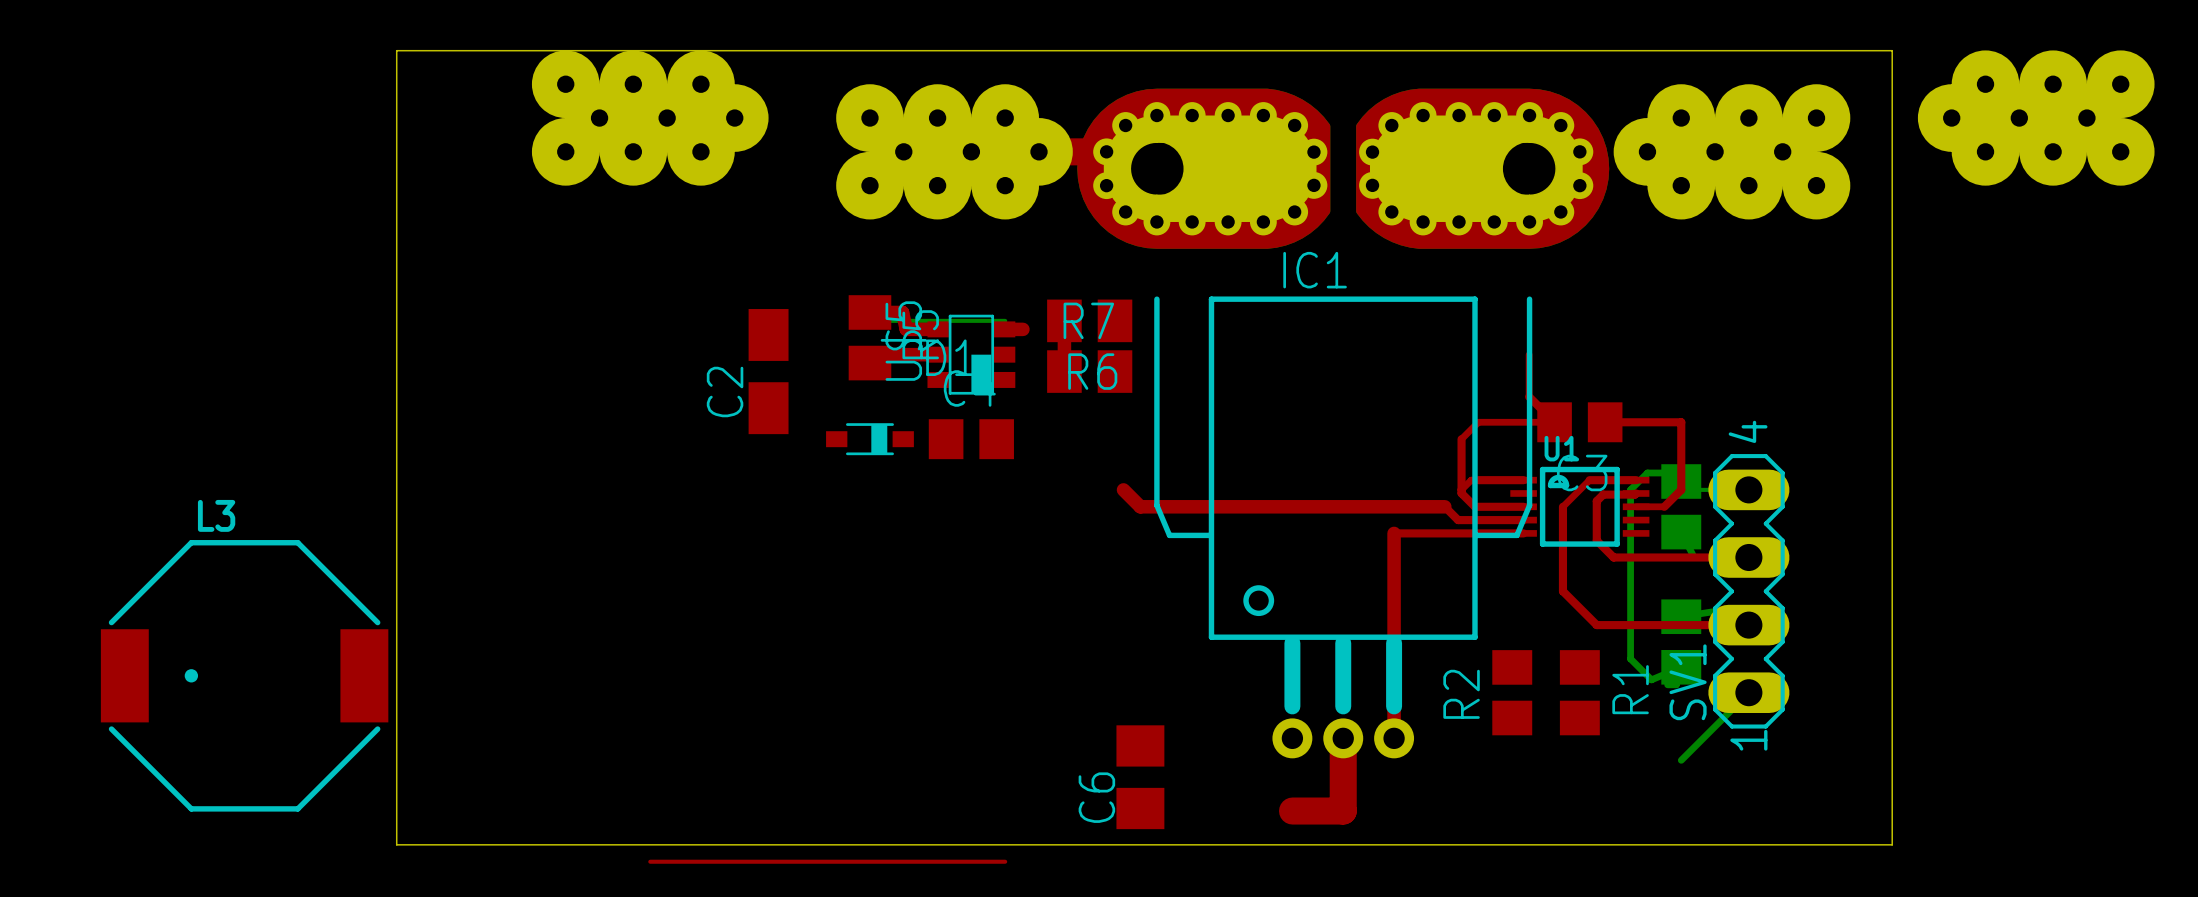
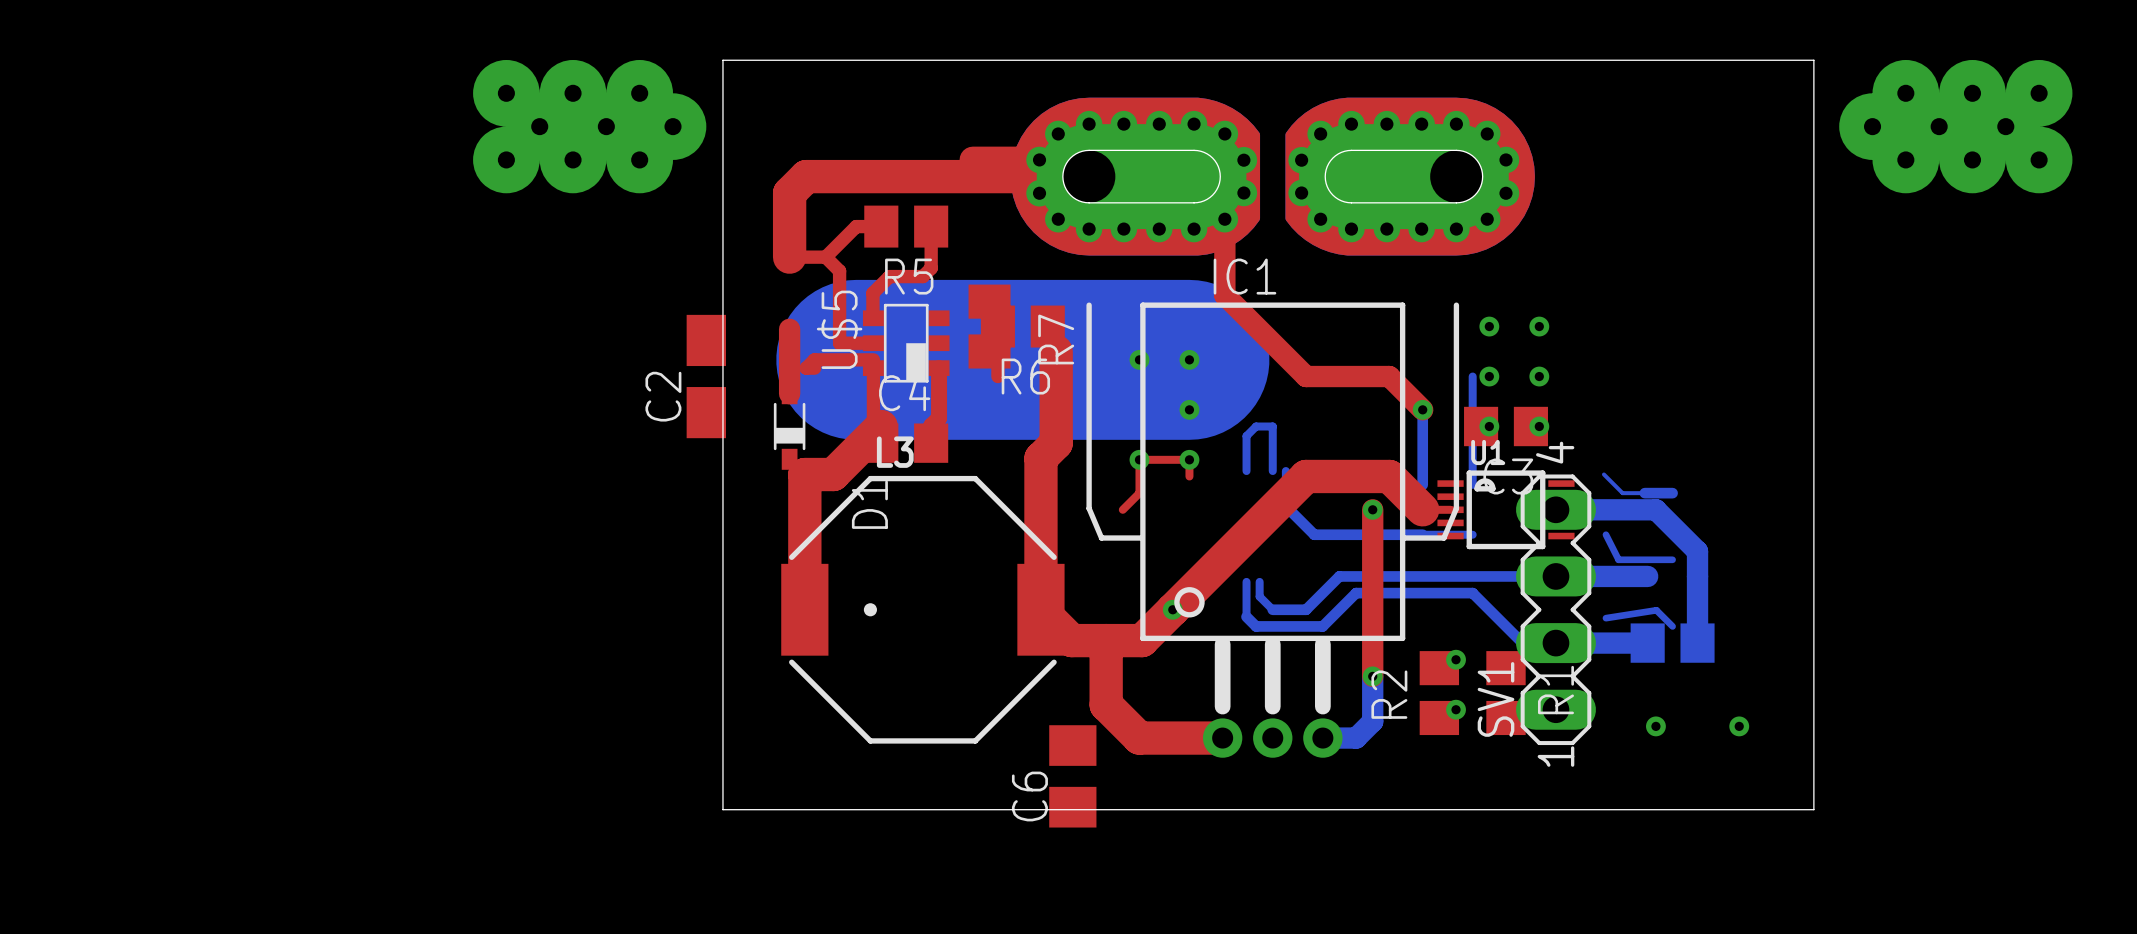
board edge: (785, 50) (396, 50) (396, 844) (1892, 844) (1892, 811) -> (722, 60) (722, 809) (1813, 809)
part: (954, 151) -> none
part: (1731, 151) -> none
top track: none -> (1089, 176) (806, 176) (789, 193) (789, 257) (825, 257)
top track: none -> (1224, 219) (1224, 295) (1306, 376) (1389, 376) (1422, 409)
top track: none -> (881, 226) (856, 226) (825, 257)
top track: none -> (931, 226) (931, 268) (922, 276) (889, 276) (872, 293) (873, 318)
top track: none -> (825, 257) (839, 271) (839, 343) (873, 343)
top track: (869, 312) (902, 312) (906, 329) (938, 329) -> none
bottom track: (869, 320) (1005, 320) -> none
via: none -> (1489, 326)
via: none -> (1539, 326)
top track: none -> (789, 329) (789, 393)
top track: (1004, 329) (1022, 329) -> none
R5 rotation: 0° (869, 337) -> 90° clockwise (906, 226)
R5 position: (869, 337) -> (906, 226)
top track: none -> (1056, 351) (1056, 443) (1040, 458) (1040, 609)
bottom track: none -> (856, 359) (1189, 359)
U$5 position: (971, 354) -> (906, 343)
via: none -> (1139, 359)
via: none -> (1189, 359)
top track: (1529, 354) (1529, 396) (1554, 422) (1478, 422) (1461, 439) (1461, 493) (1475, 506) (1495, 506) -> (1040, 609) (1071, 640) (1141, 640) (1306, 476) (1389, 476) (1422, 509)
top track: none -> (873, 368) (873, 418) (881, 426) (833, 474) (804, 474) (804, 609)
top track: none -> (939, 368) (939, 418) (931, 425)
R7 rotation: 0° (1089, 371) -> 90° clockwise (989, 326)
R7 position: (1089, 371) -> (989, 326)
bottom track: none -> (1472, 376) (1472, 484)
via: none -> (1489, 376)
via: none -> (1539, 376)
via: none -> (1189, 409)
bottom track: none -> (1422, 409) (1422, 484)
via: none -> (1422, 409)
via: none -> (1489, 426)
top track: (1605, 422) (1681, 422) (1681, 489) (1664, 506) (1636, 506) -> none
via: none -> (1539, 426)
D1 rotation: 0° (869, 439) -> 90° clockwise (789, 426)
via: none -> (1139, 459)
via: none -> (1189, 459)
bottom track: none -> (1246, 471) (1246, 436) (1256, 426) (1272, 426) (1272, 471)
bottom track: none -> (1285, 471) (1285, 506) (1314, 534) (1472, 534)
top track: none -> (1189, 476) (1189, 459) (1139, 459) (1139, 493) (1122, 509)
top track: (1478, 480) (1523, 480) (1471, 480) (1461, 489) -> none
top track: (1636, 480) (1589, 480) (1562, 506) (1562, 591) (1596, 625) (1748, 625) -> none
bottom track: (1681, 481) (1679, 470) (1677, 472) (1647, 472) (1630, 489) (1630, 658) (1651, 679) (1681, 667) (1676, 684) (1667, 684) -> none
top track: (1123, 489) (1140, 506) (1444, 506) (1458, 520) (1523, 520) -> none
top track: (1636, 493) (1603, 494) (1596, 501) (1596, 540) (1613, 557) (1719, 557) -> none
top track: none -> (1372, 509) (1372, 676)
via: none -> (1372, 509)
bottom track: none -> (1555, 509) (1655, 509) (1697, 551) (1697, 643)
part: (1681, 506) -> none
top track: (1523, 533) (1394, 533) (1394, 738) -> none
bottom track: none -> (1647, 576) (1339, 576) (1306, 609) (1272, 609) (1259, 596) (1259, 581)
bottom track: none -> (1246, 581) (1246, 616) (1256, 626) (1322, 626) (1356, 593) (1472, 593) (1522, 643) (1647, 643)
SV1 position: (1748, 591) -> (1555, 609)
via: none -> (1172, 609)
top track: none -> (1101, 643) (1106, 640) (1106, 704) (1139, 738) (1222, 738)
part rotation: 0° (1681, 642) -> 90° clockwise (1672, 643)
part position: (1681, 642) -> (1672, 643)
via: none -> (1456, 659)
L3 position: (244, 675) -> (922, 609)
bottom track: none -> (1372, 676) (1372, 721) (1356, 738) (1322, 738)
via: none -> (1372, 676)
bottom track: (1748, 692) (1681, 760) -> none
via: none -> (1456, 709)
via: none -> (1655, 726)
via: none -> (1739, 726)
top track: (1343, 738) (1343, 811) (1292, 811) -> none
top track: (650, 861) (1005, 861) -> none

